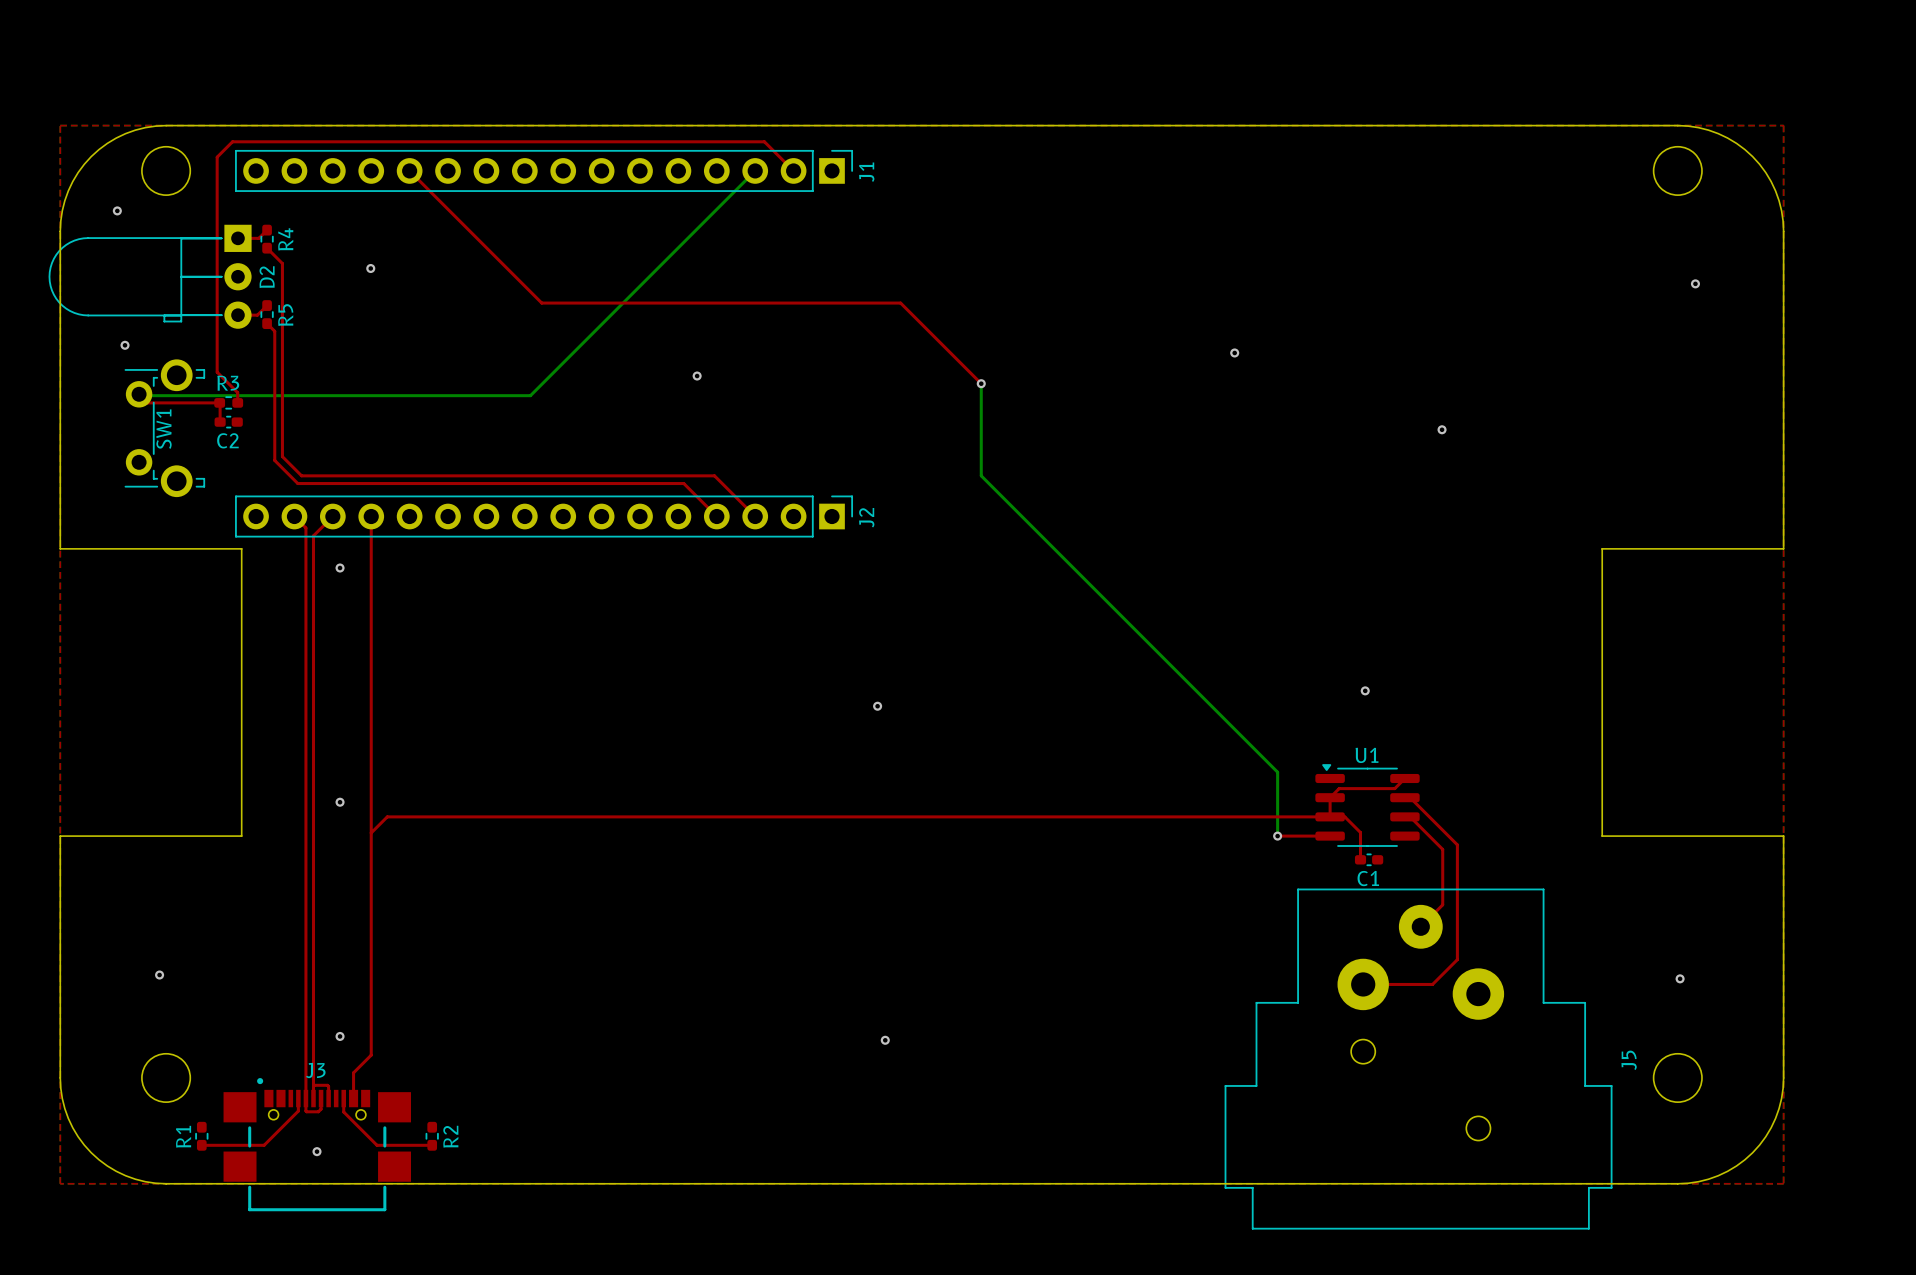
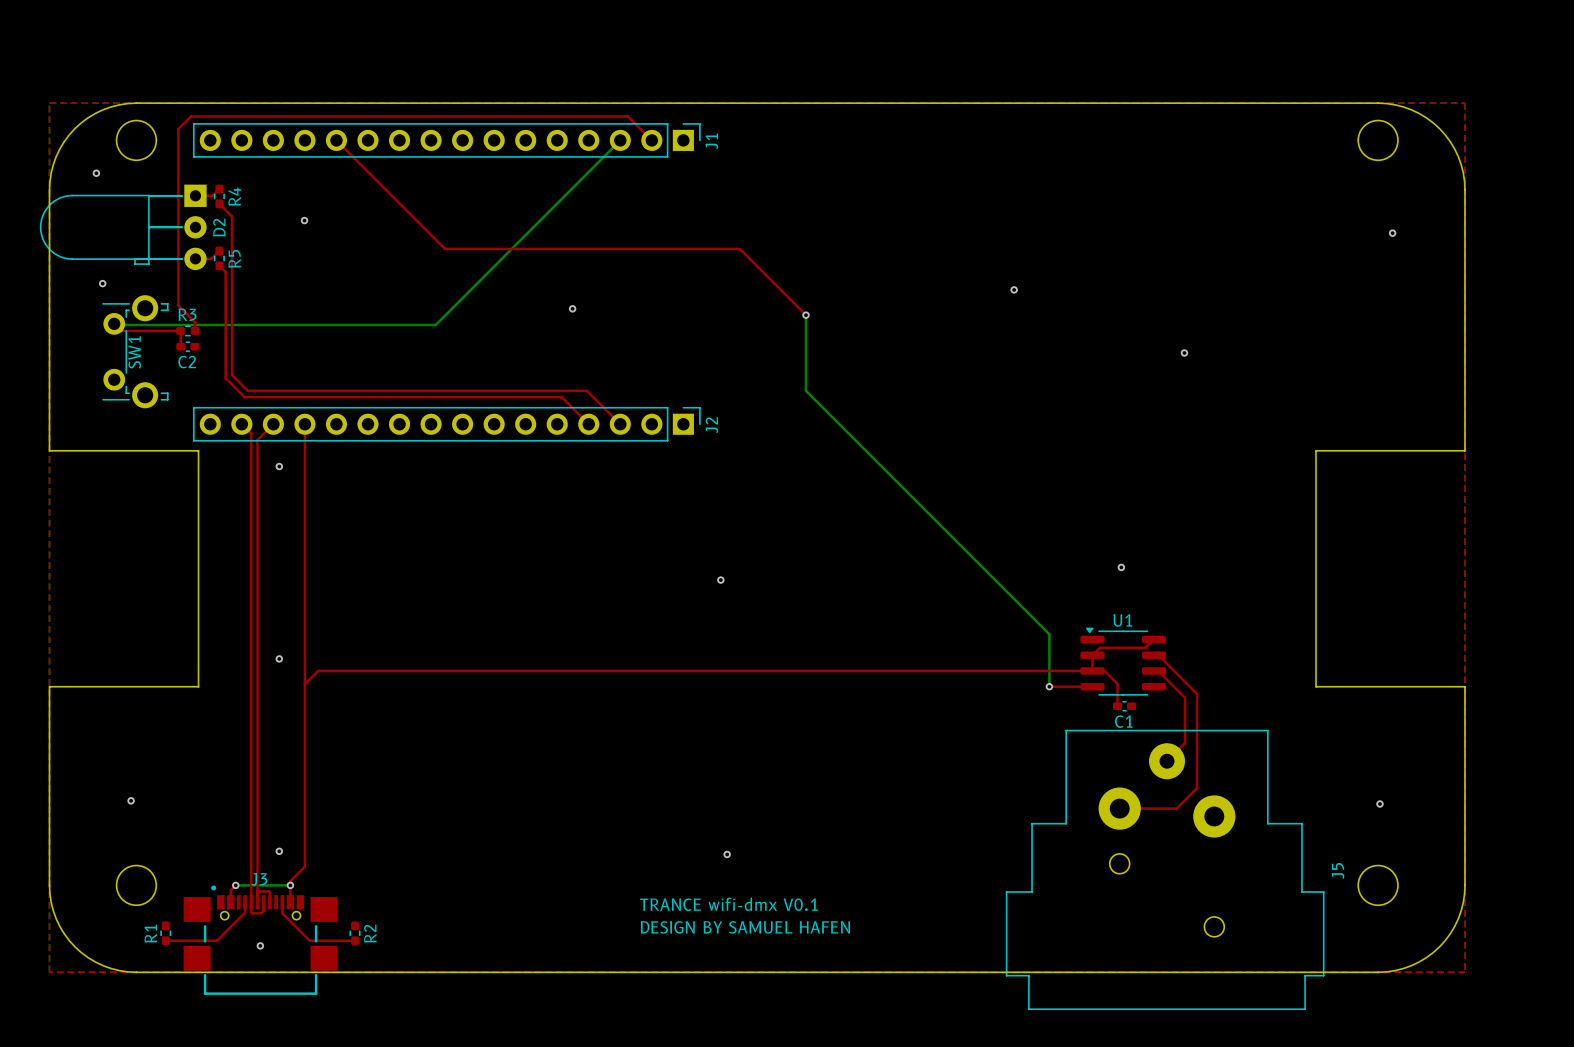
top track: none -> (235, 885) (230, 890) (230, 902)
bottom track: none -> (235, 885) (290, 885)
via: none -> (235, 885)
via: none -> (290, 885)
text: none -> TRANCE wifi-dmx V0.1 (728, 904)
text: none -> DESIGN BY SAMUEL HAFEN (745, 927)

